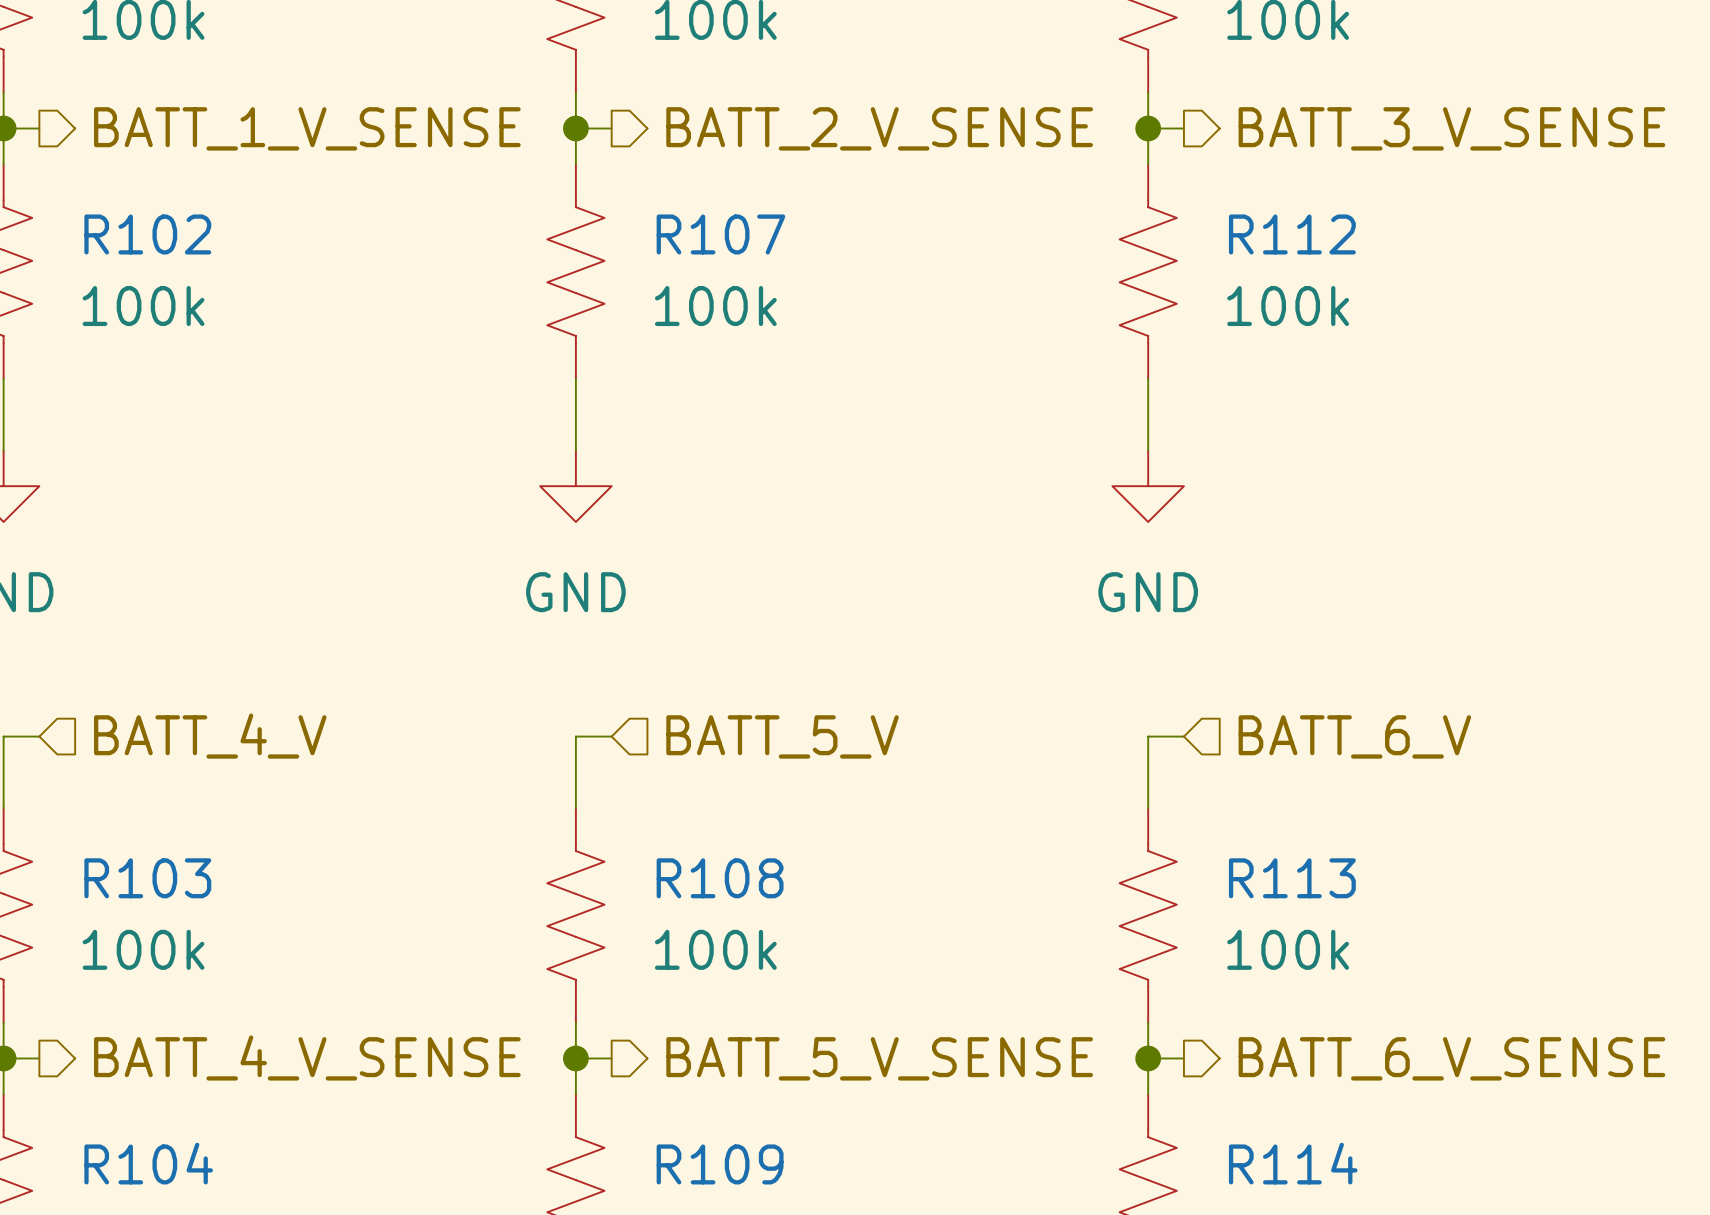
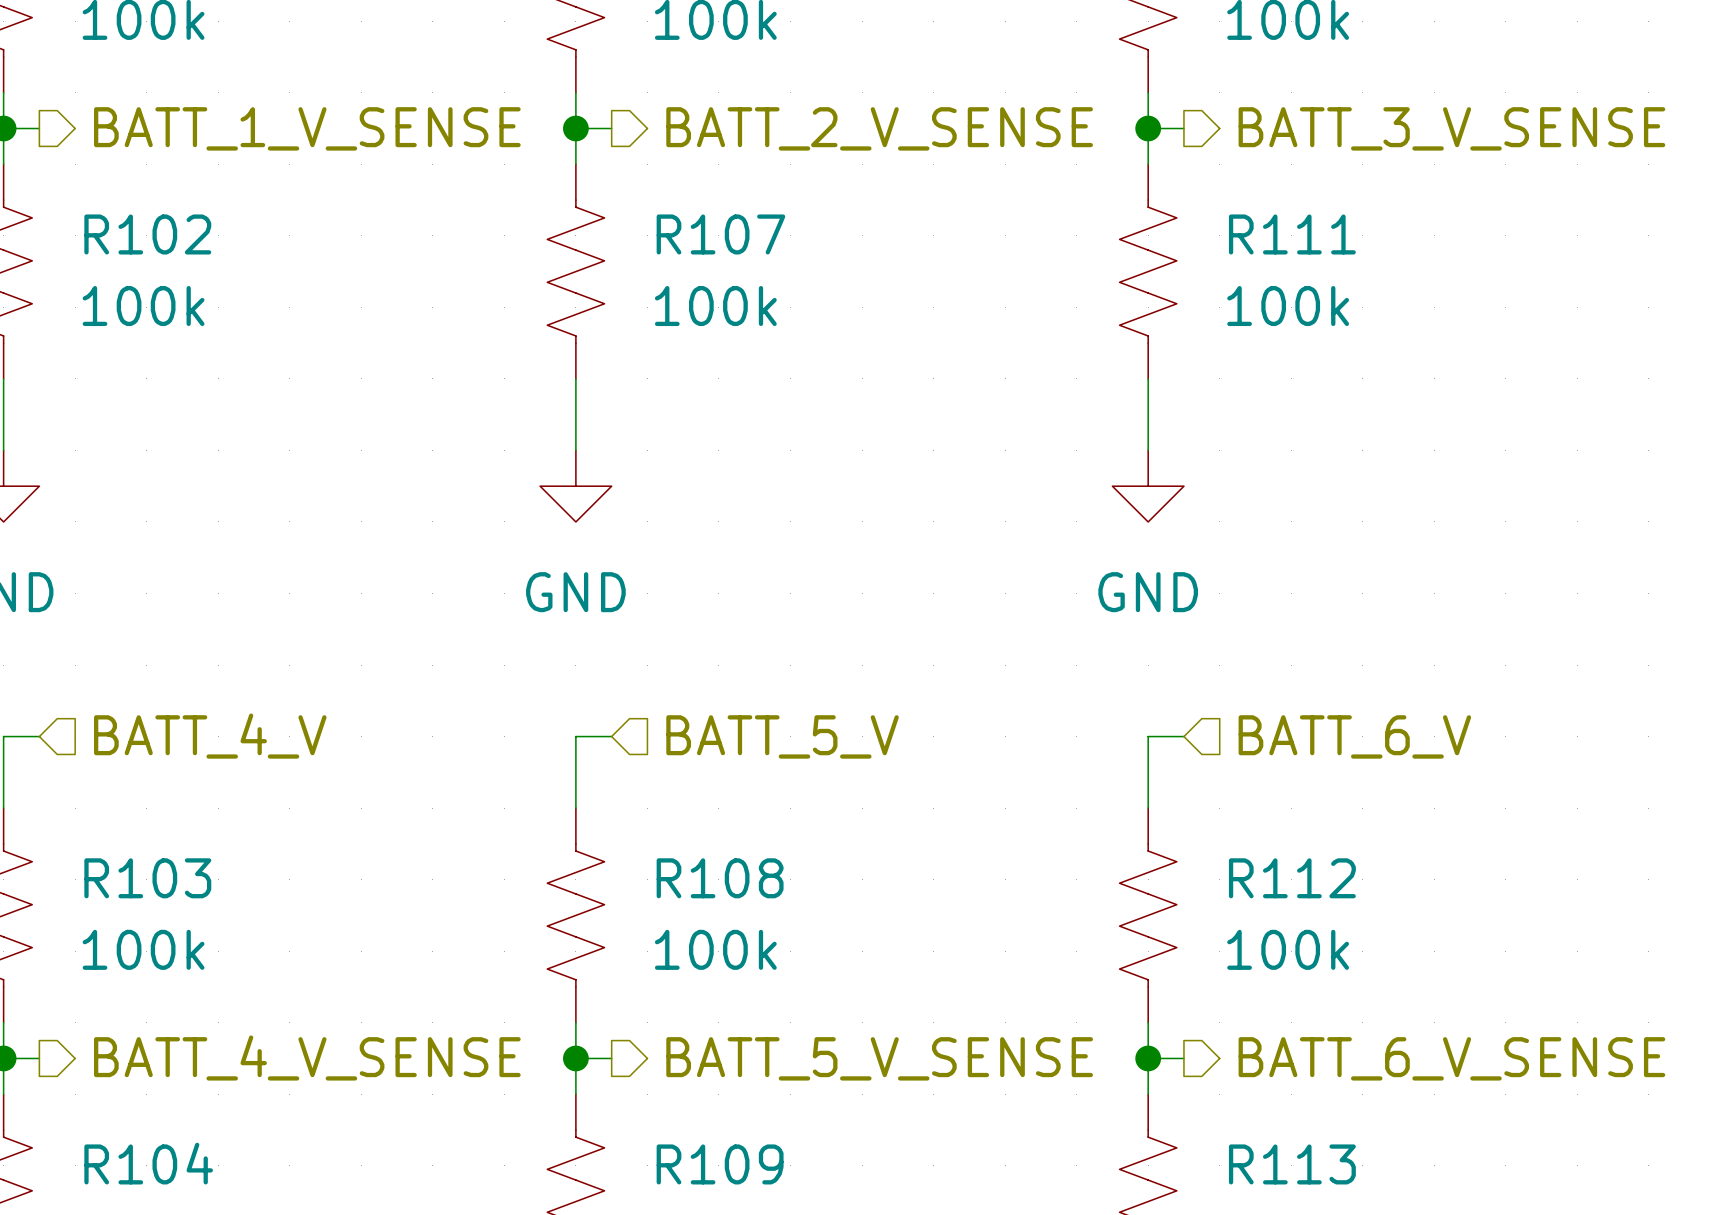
R112 name: R112 (1292, 234) -> R111 (1292, 234)
R113 name: R113 (1292, 878) -> R112 (1292, 878)
R114 name: R114 (1293, 1163) -> R113 (1292, 1164)

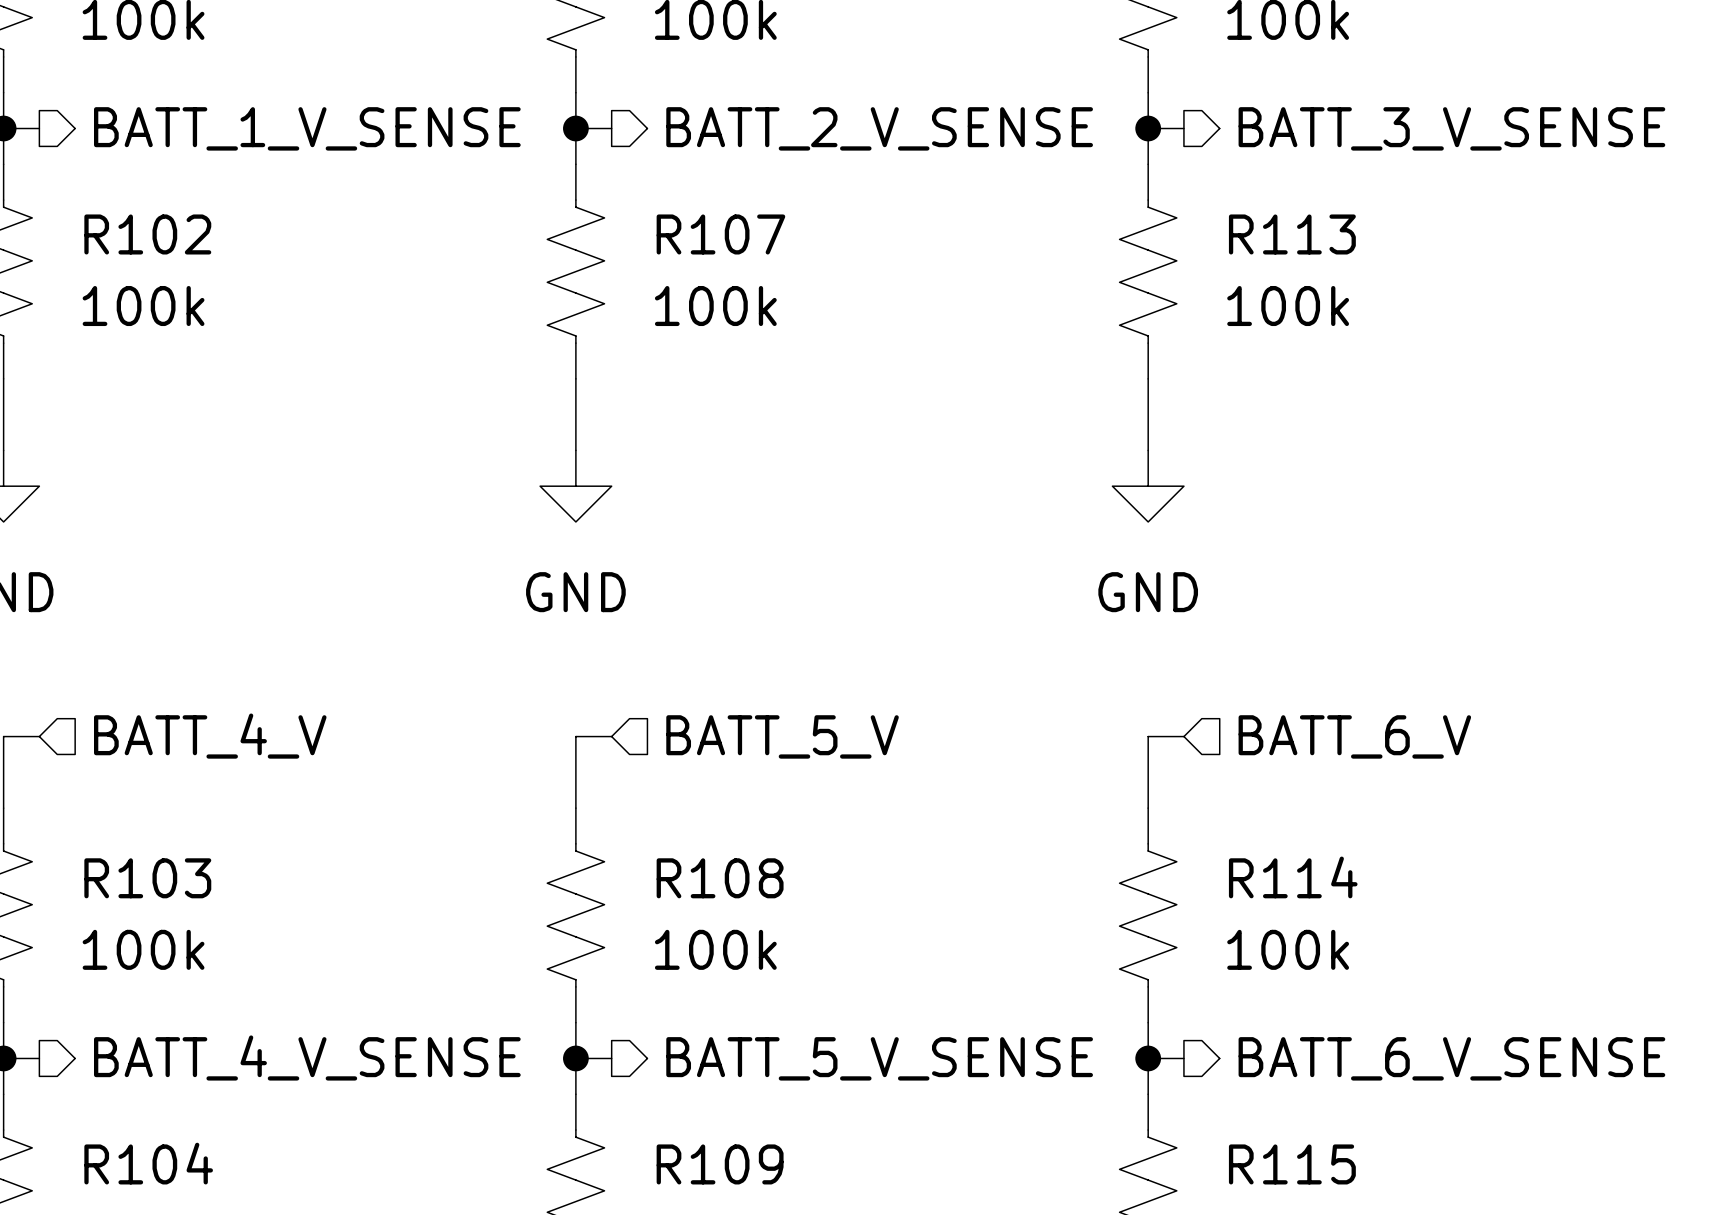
R111 name: R111 (1292, 234) -> R113 (1292, 234)
R112 name: R112 (1292, 878) -> R114 (1293, 877)
R113 name: R113 (1292, 1164) -> R115 (1292, 1164)

